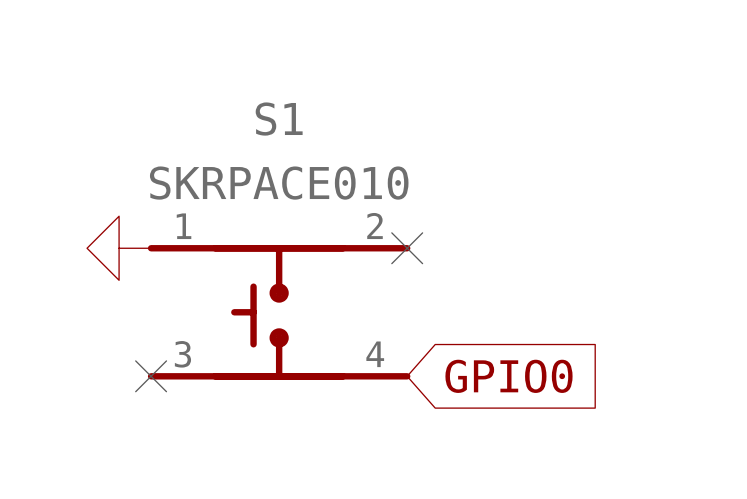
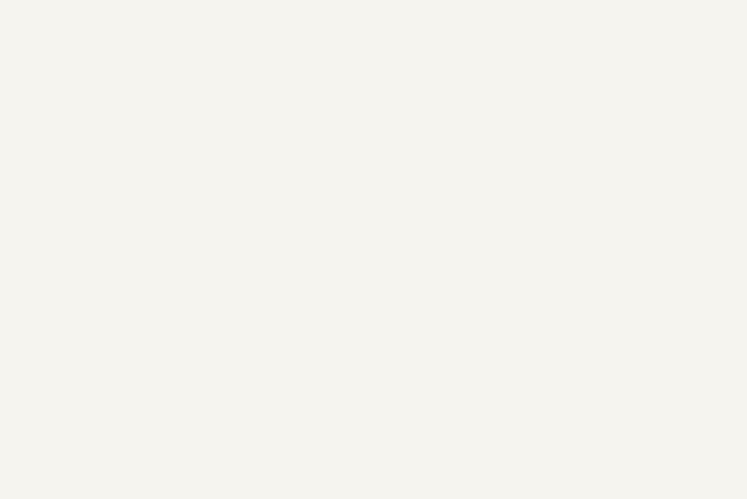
power symbol: (119, 248) -> none
no-connect mark: (407, 248) -> none
S1: SKRPACE010 (279, 312) -> none
no-connect mark: (151, 376) -> none
global label: GPIO0 (508, 376) -> none

